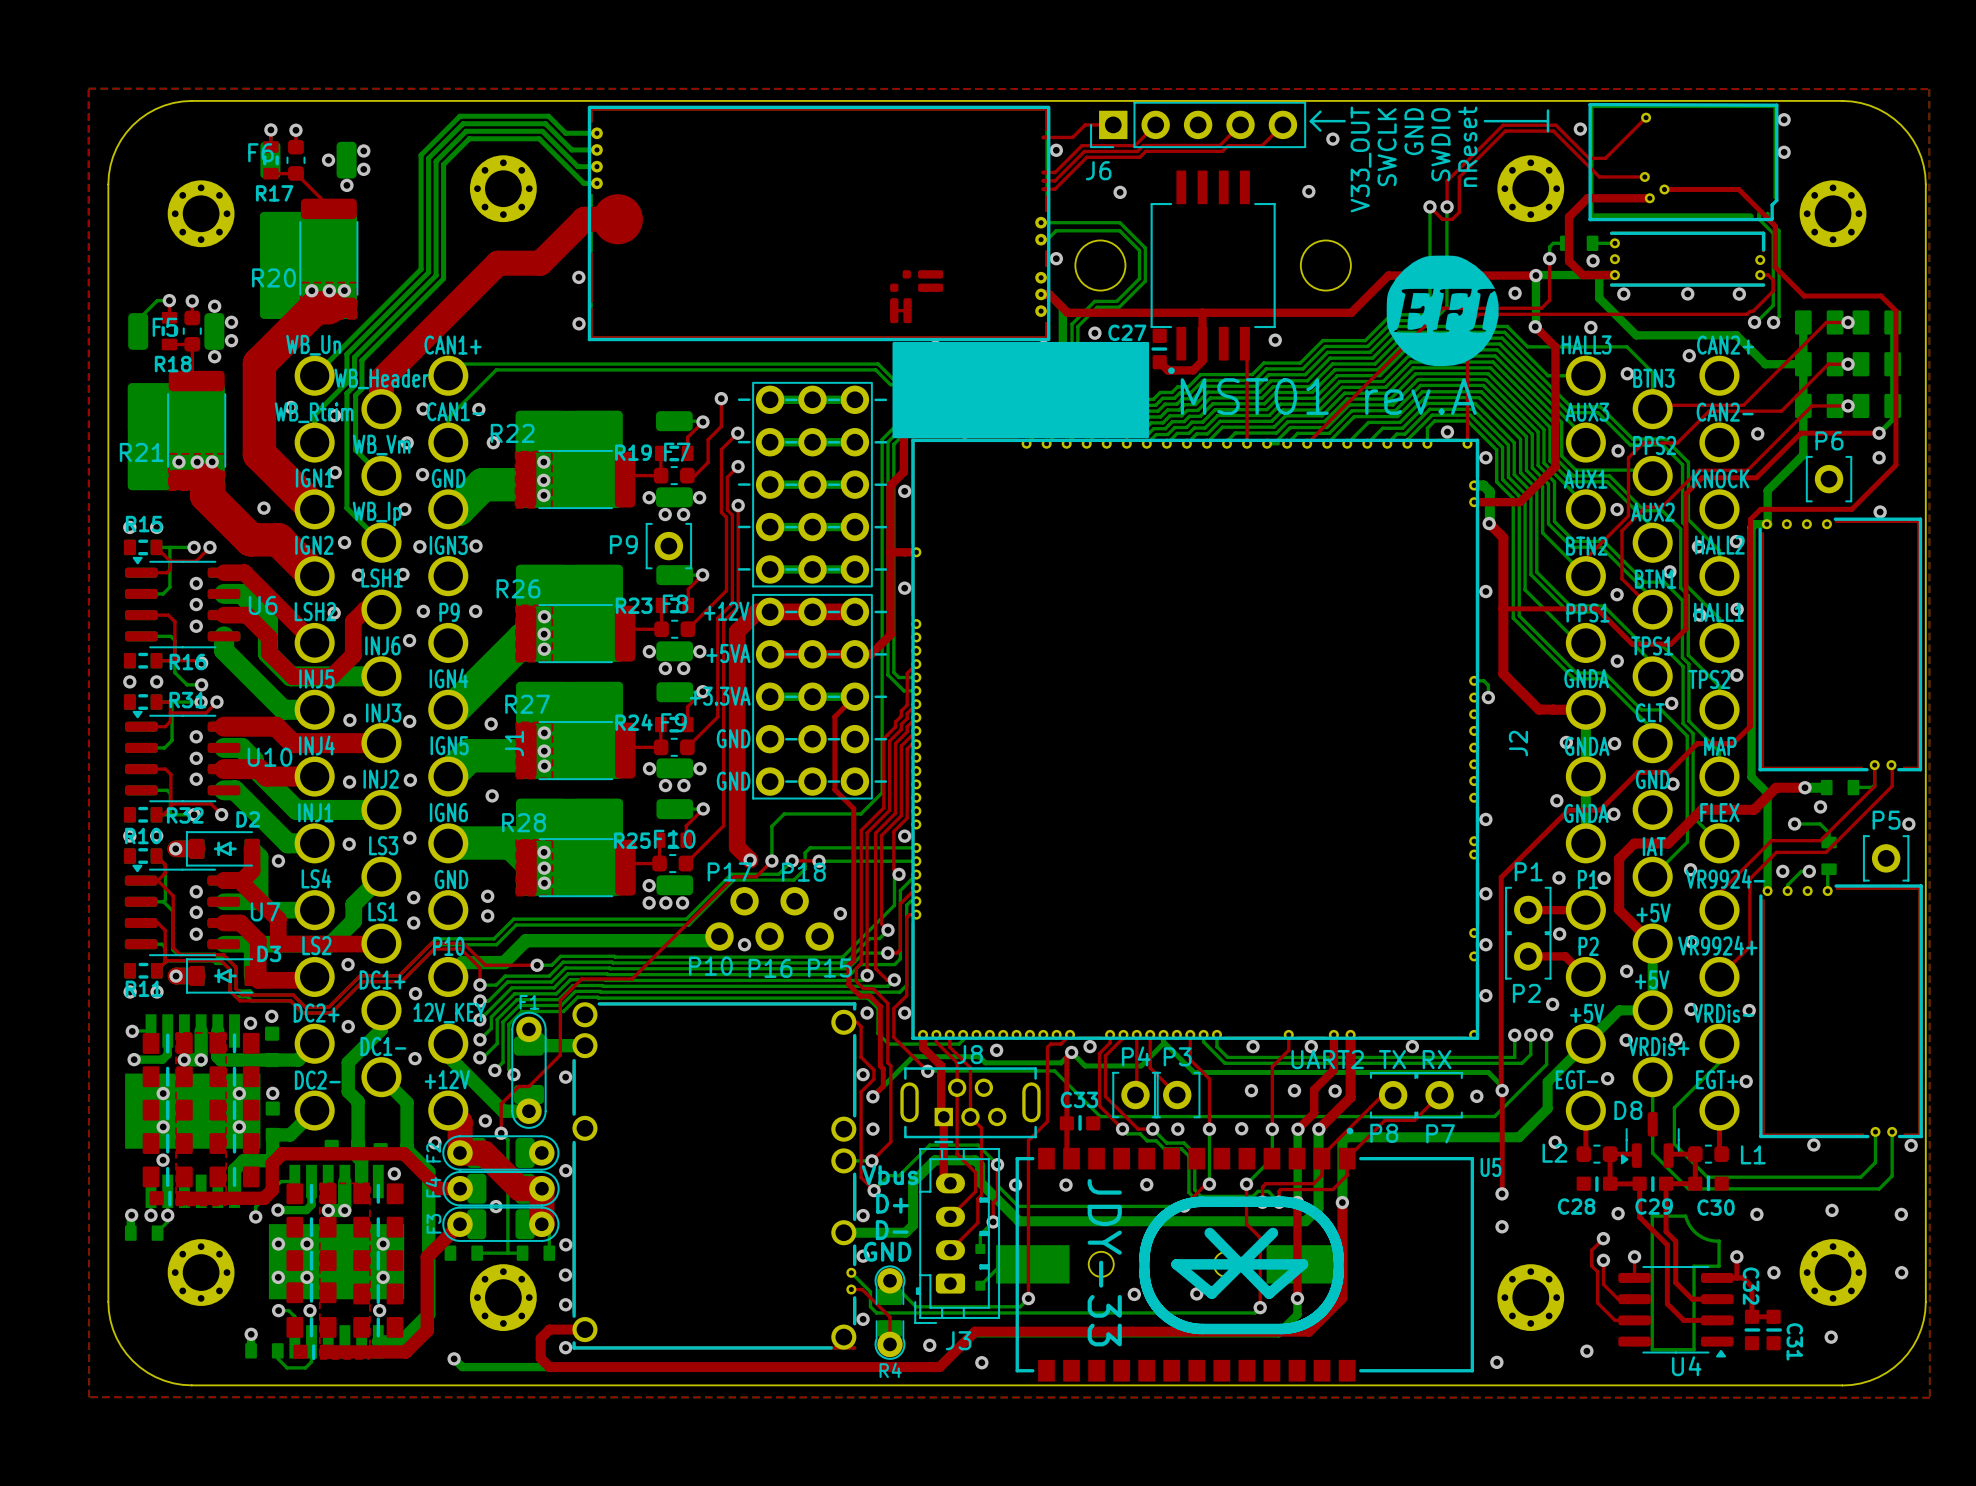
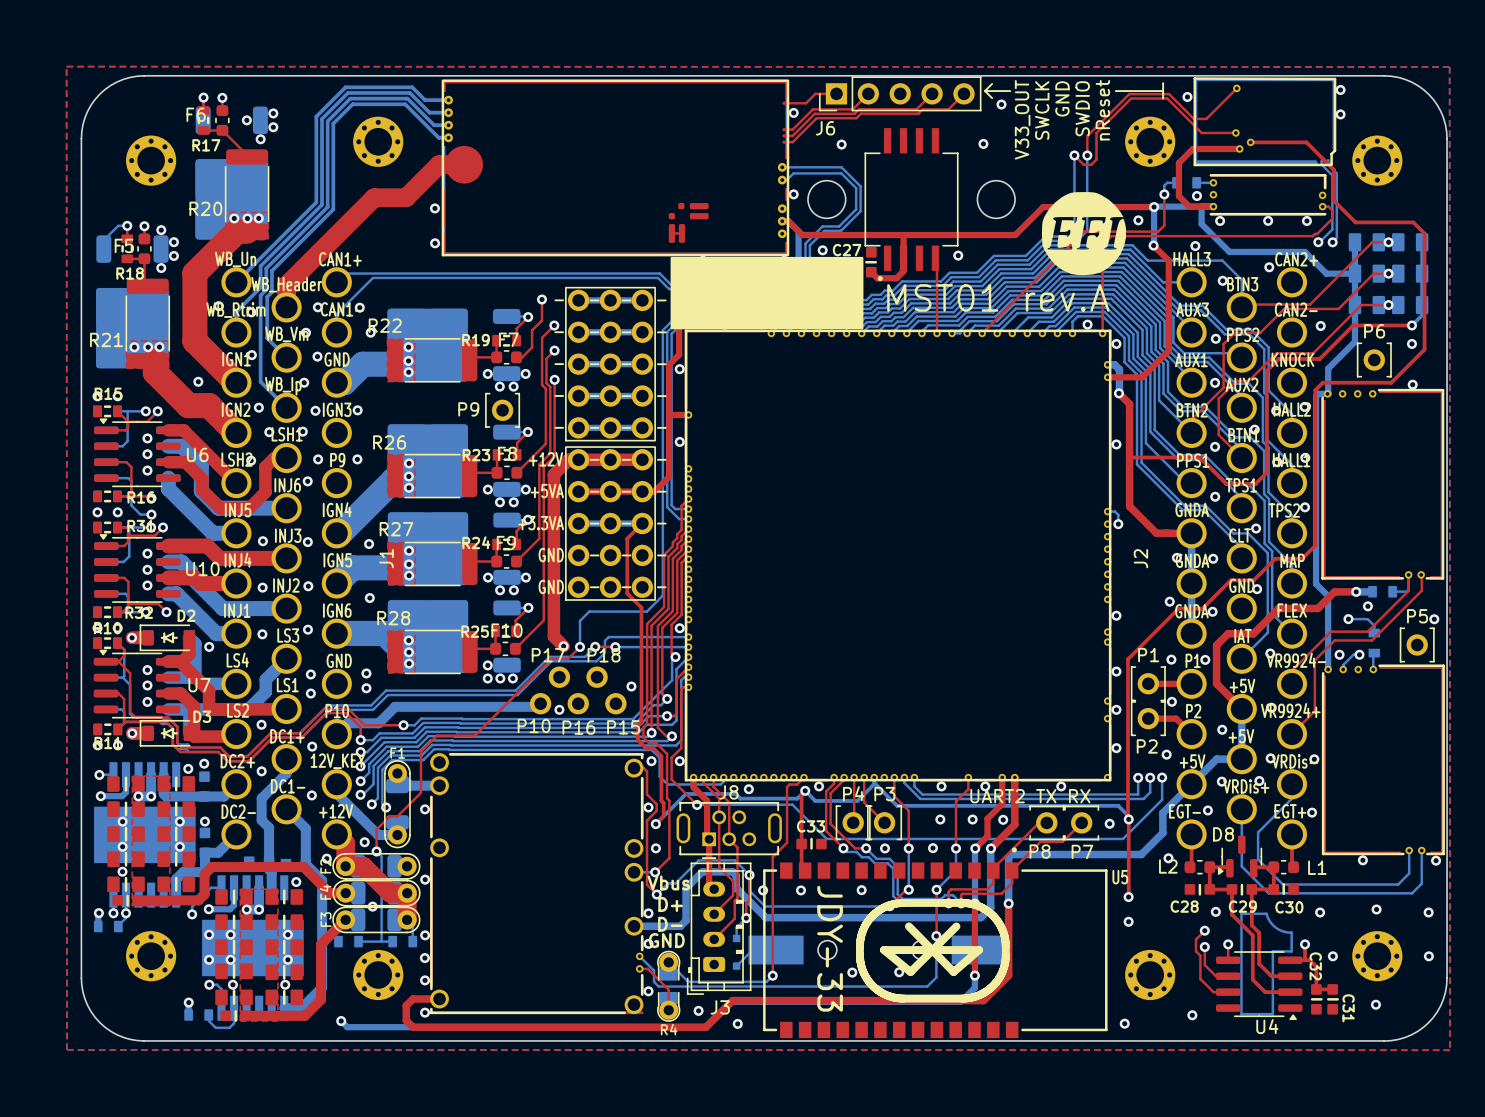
top track: (1246, 1224) (1260, 1237) (1260, 1307) -> (936, 919) (936, 936)
bottom track: (1260, 1307) (1254, 1312) (1234, 1312) -> (936, 936) (936, 977) (927, 986)
via position: (1260, 1307) -> (936, 936)

